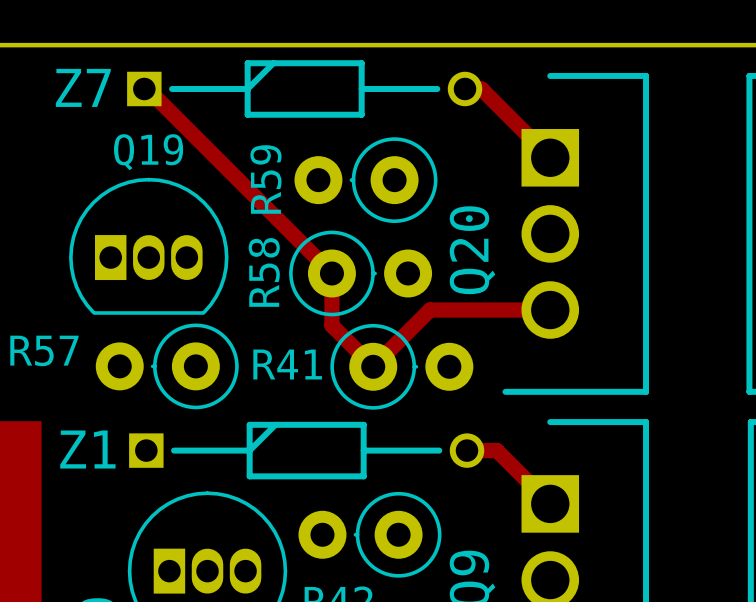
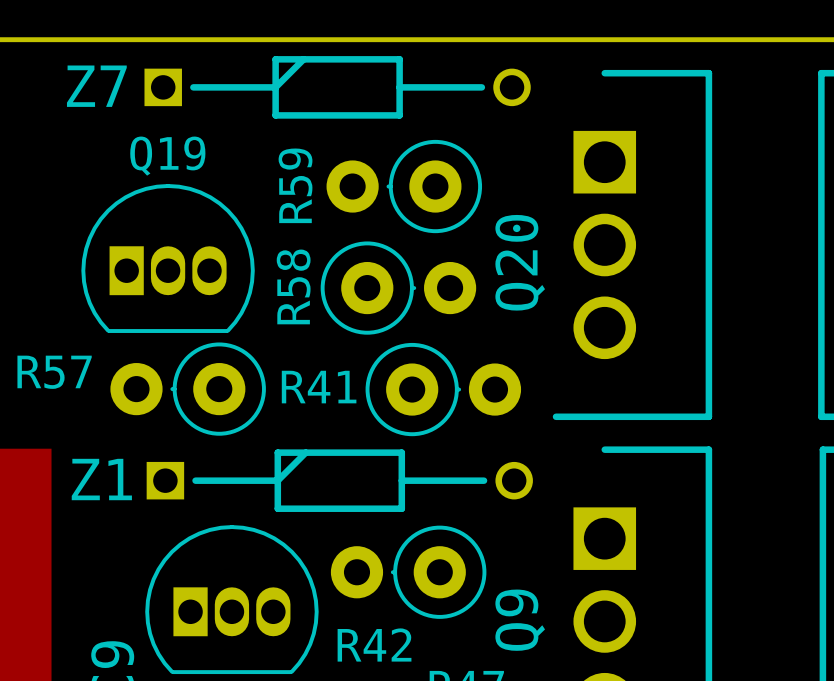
track: (144, 88) (147, 88) (331, 273) (331, 325) (373, 366) (430, 310) (550, 310) -> none
track: (465, 88) (481, 88) (550, 157) -> none
track: (467, 450) (496, 450) (550, 503) -> none

